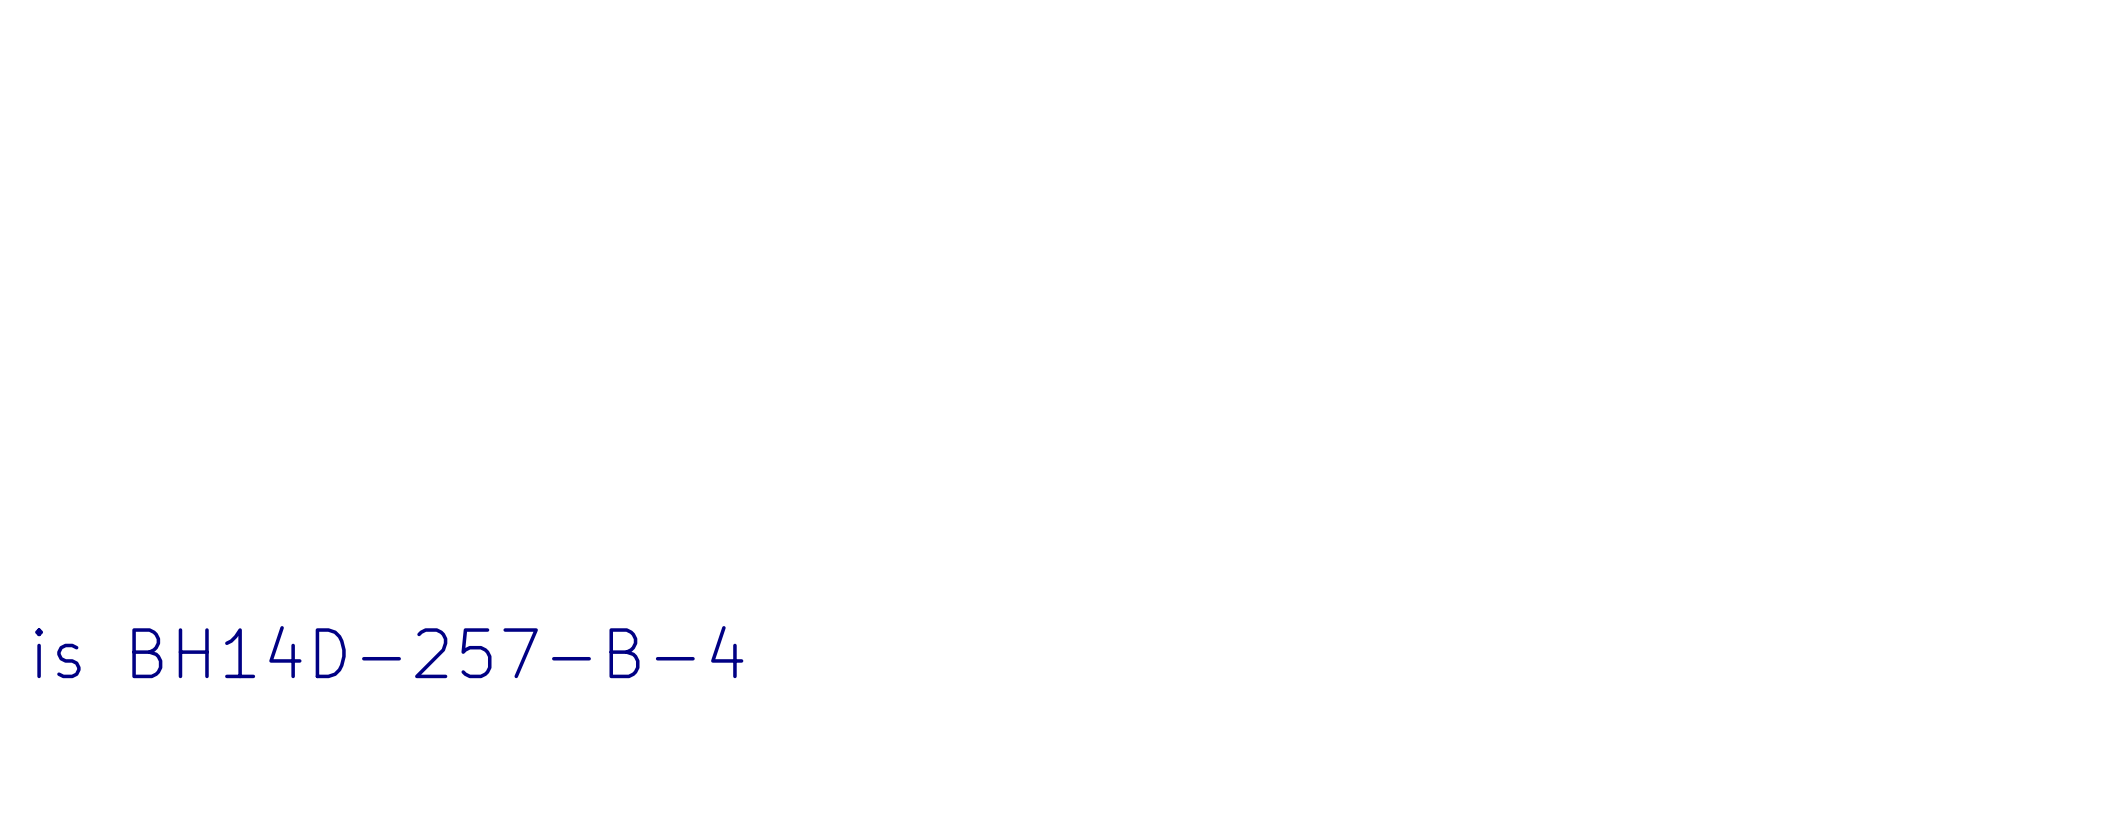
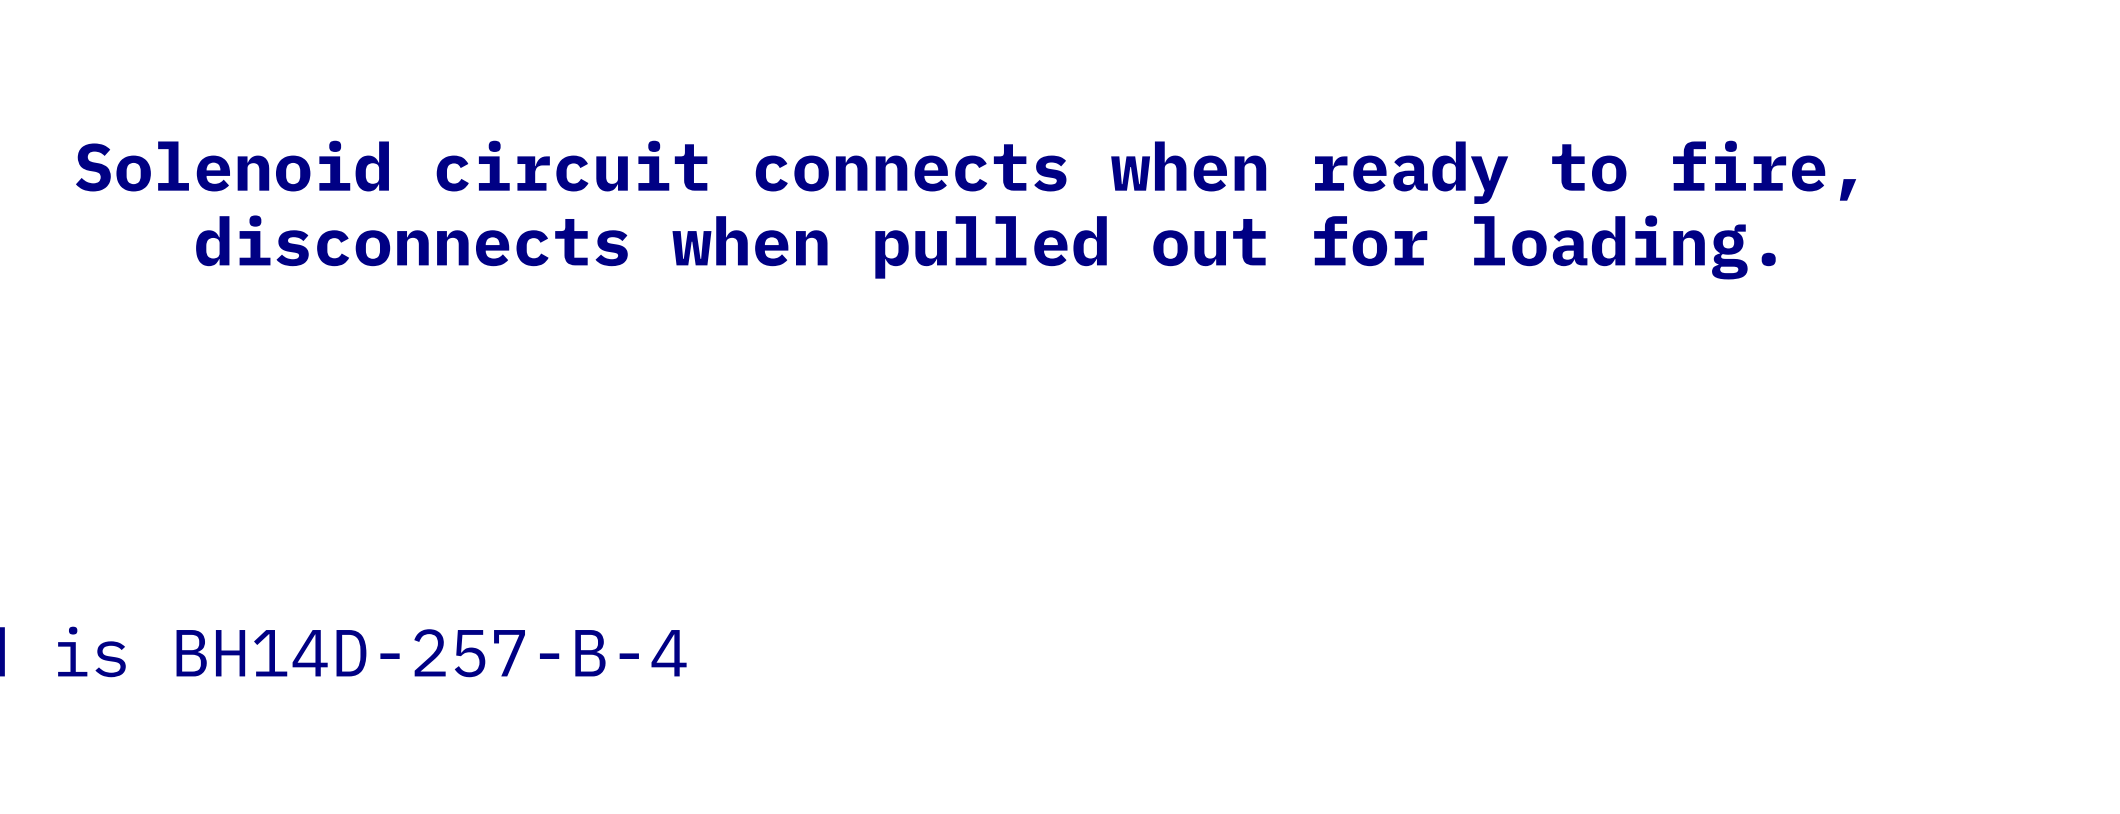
text: none -> Solenoid circuit connects when ready to fire, (966, 172)
text: none -> disconnects when pulled out for loading. (985, 247)

